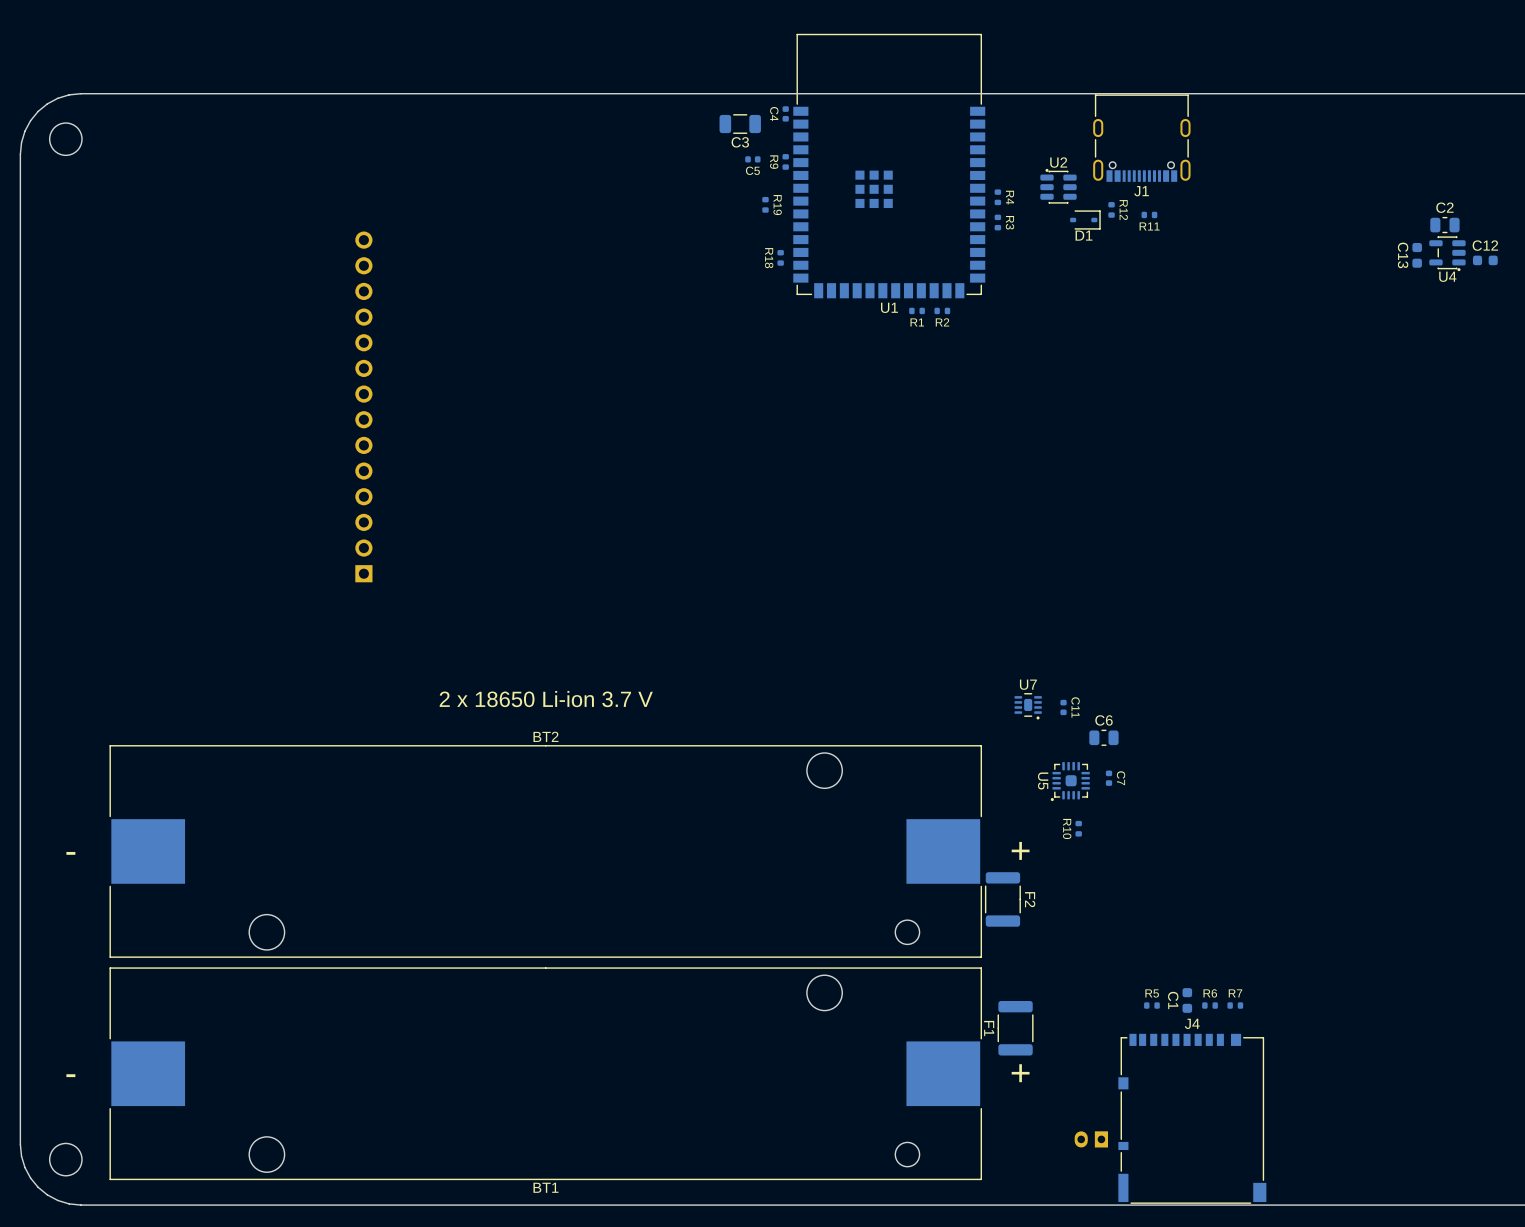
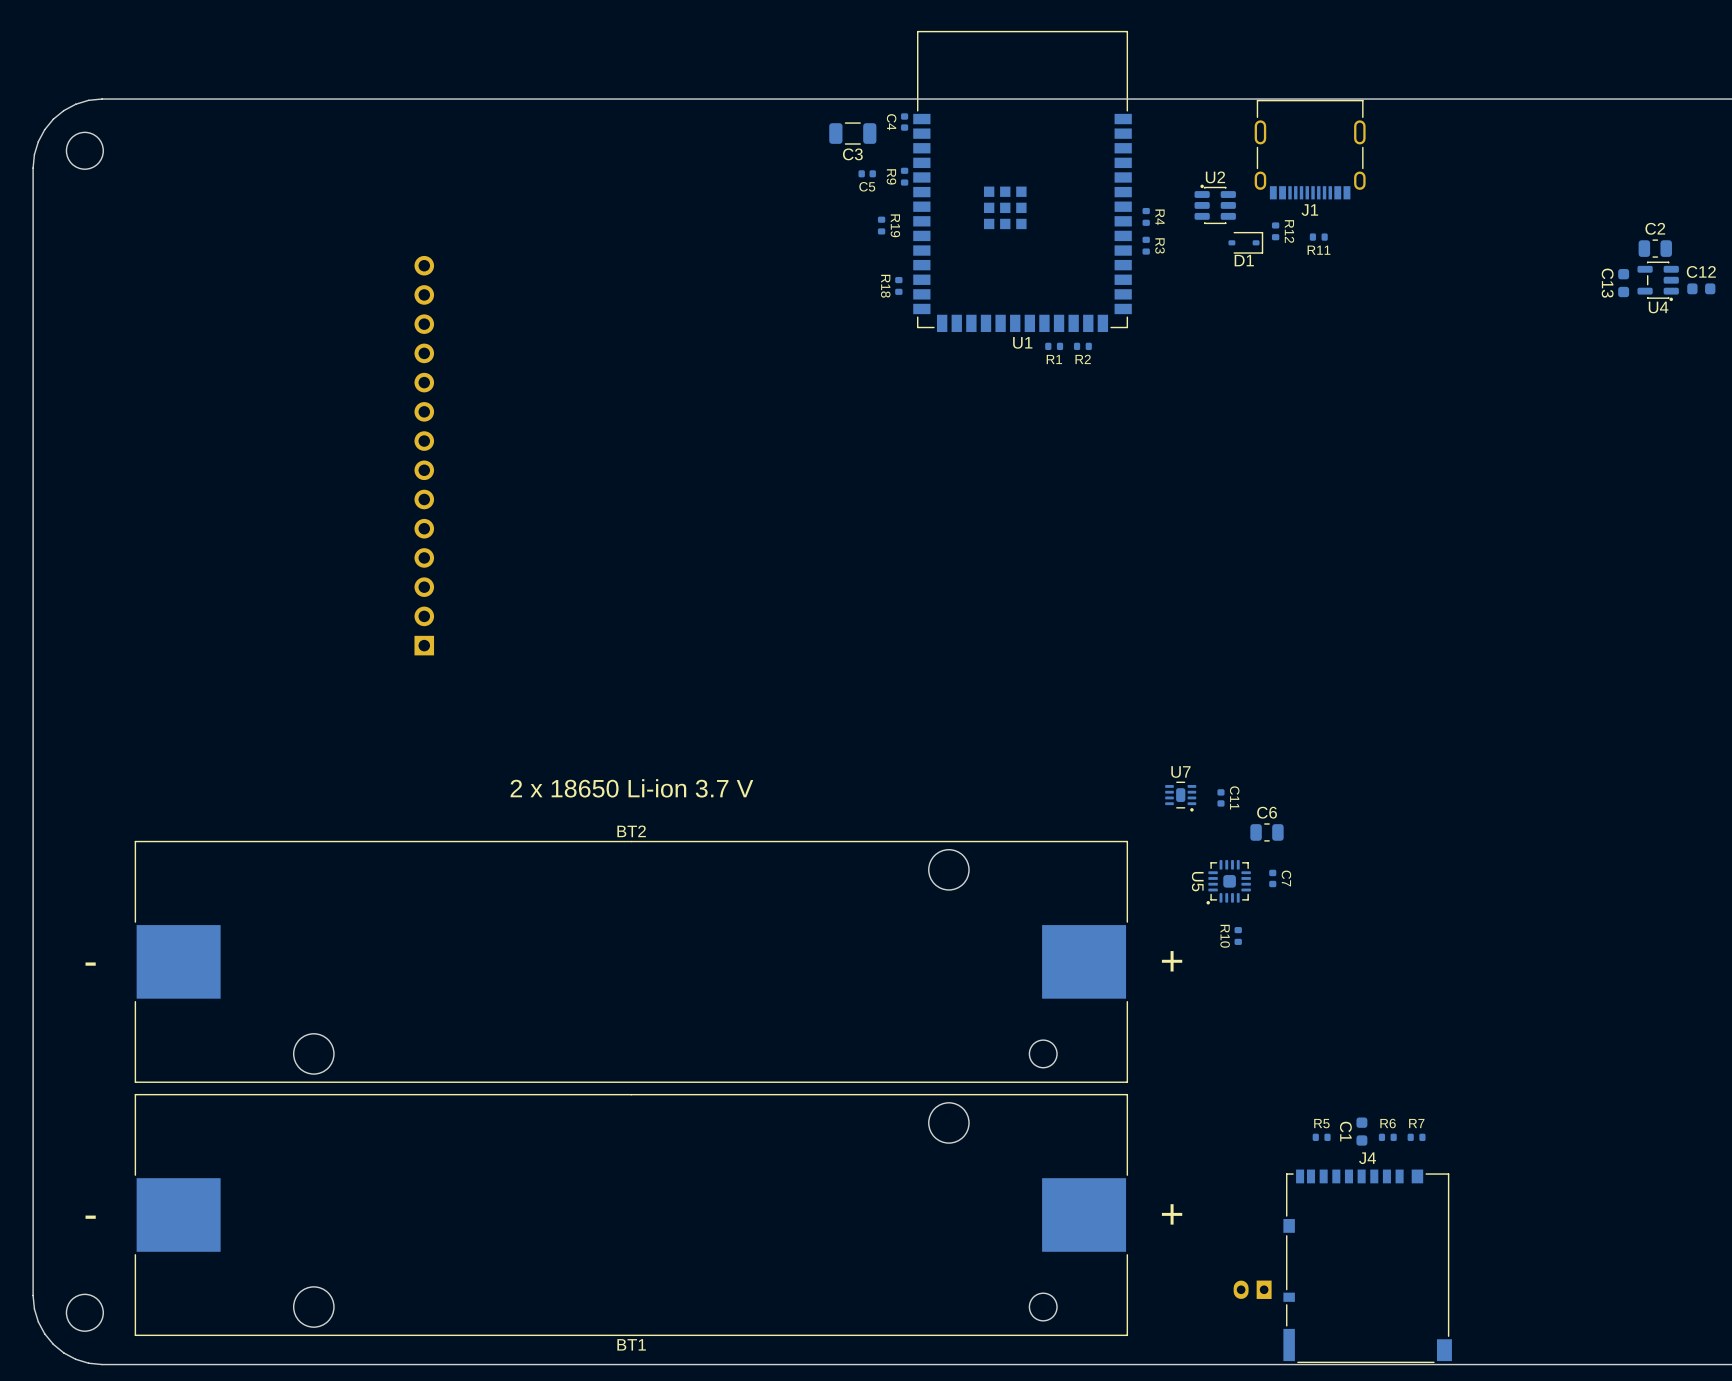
J1 footprint: [1093, 94, 1191, 182] -> [1254, 99, 1366, 200]
F2: (1002, 899) -> none
F1: (1015, 1028) -> none

